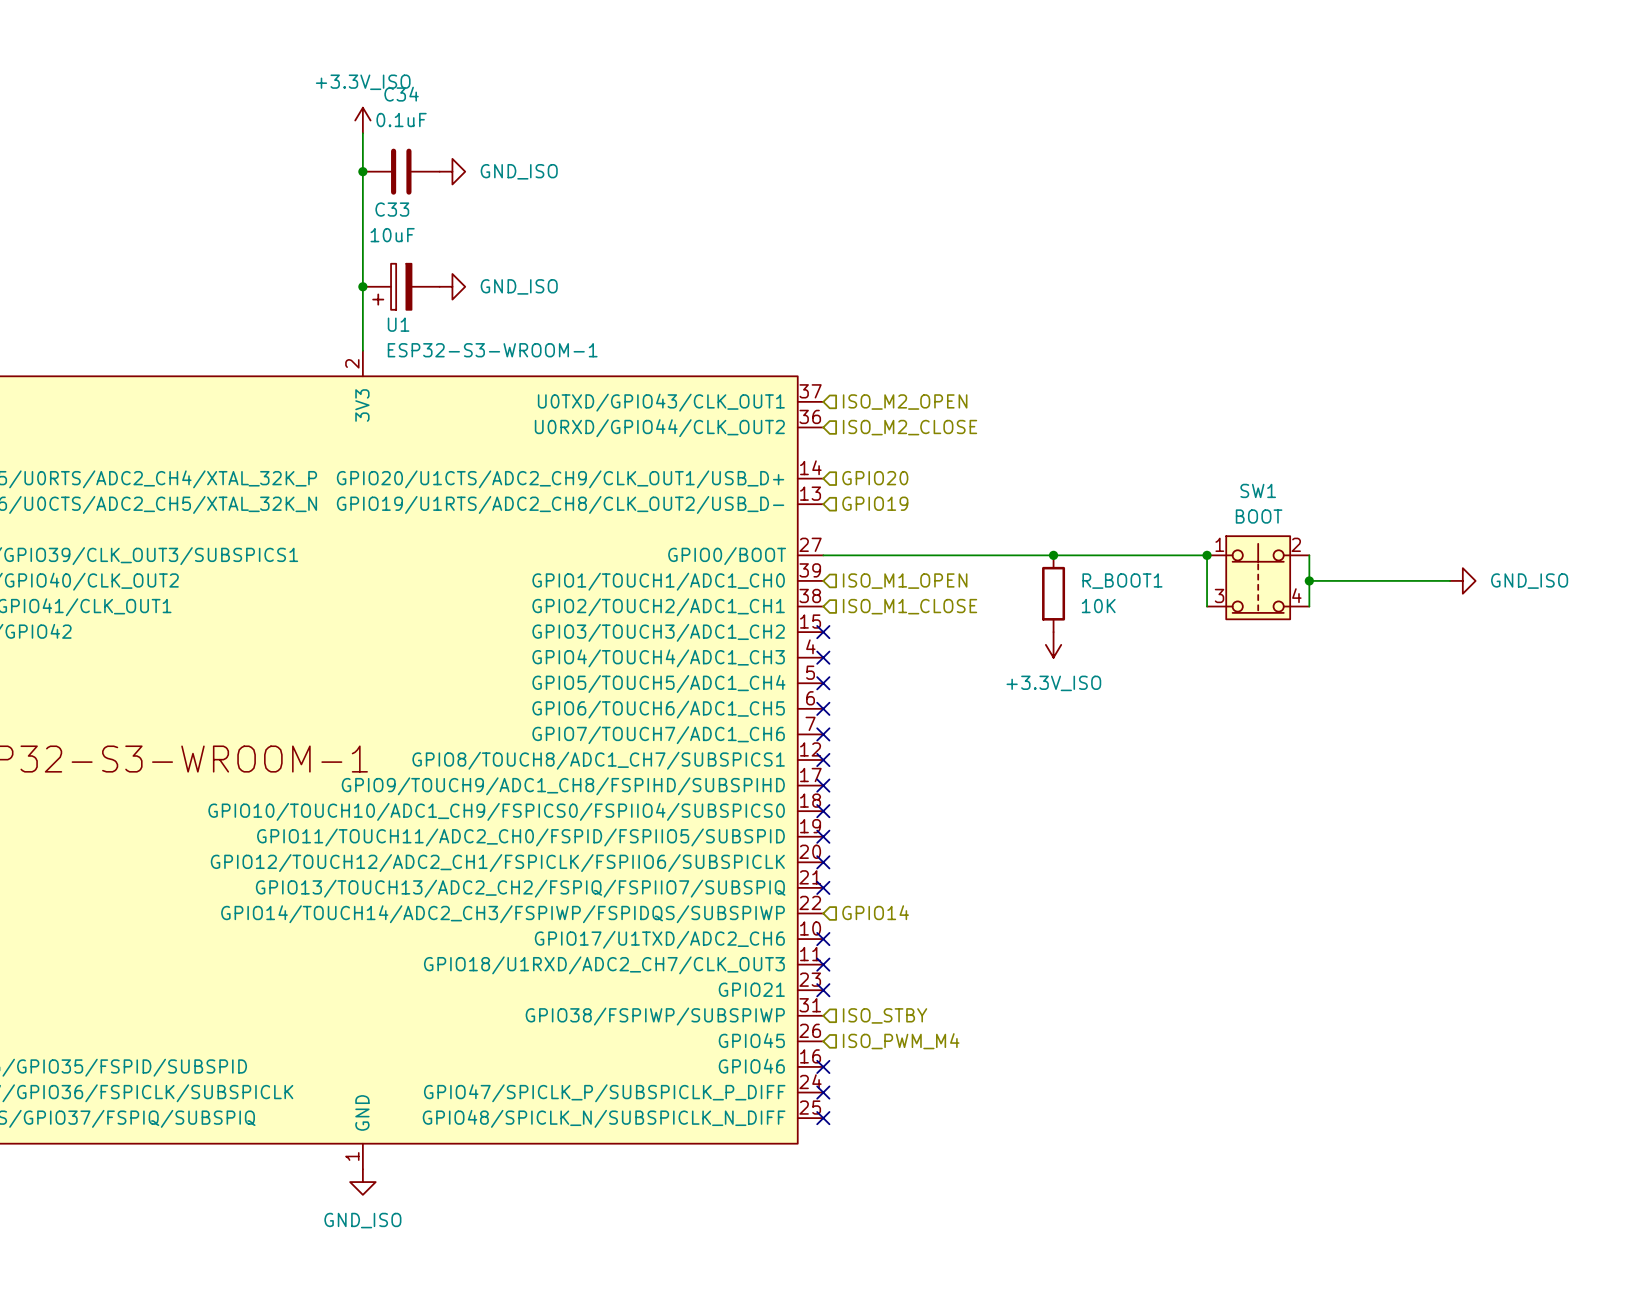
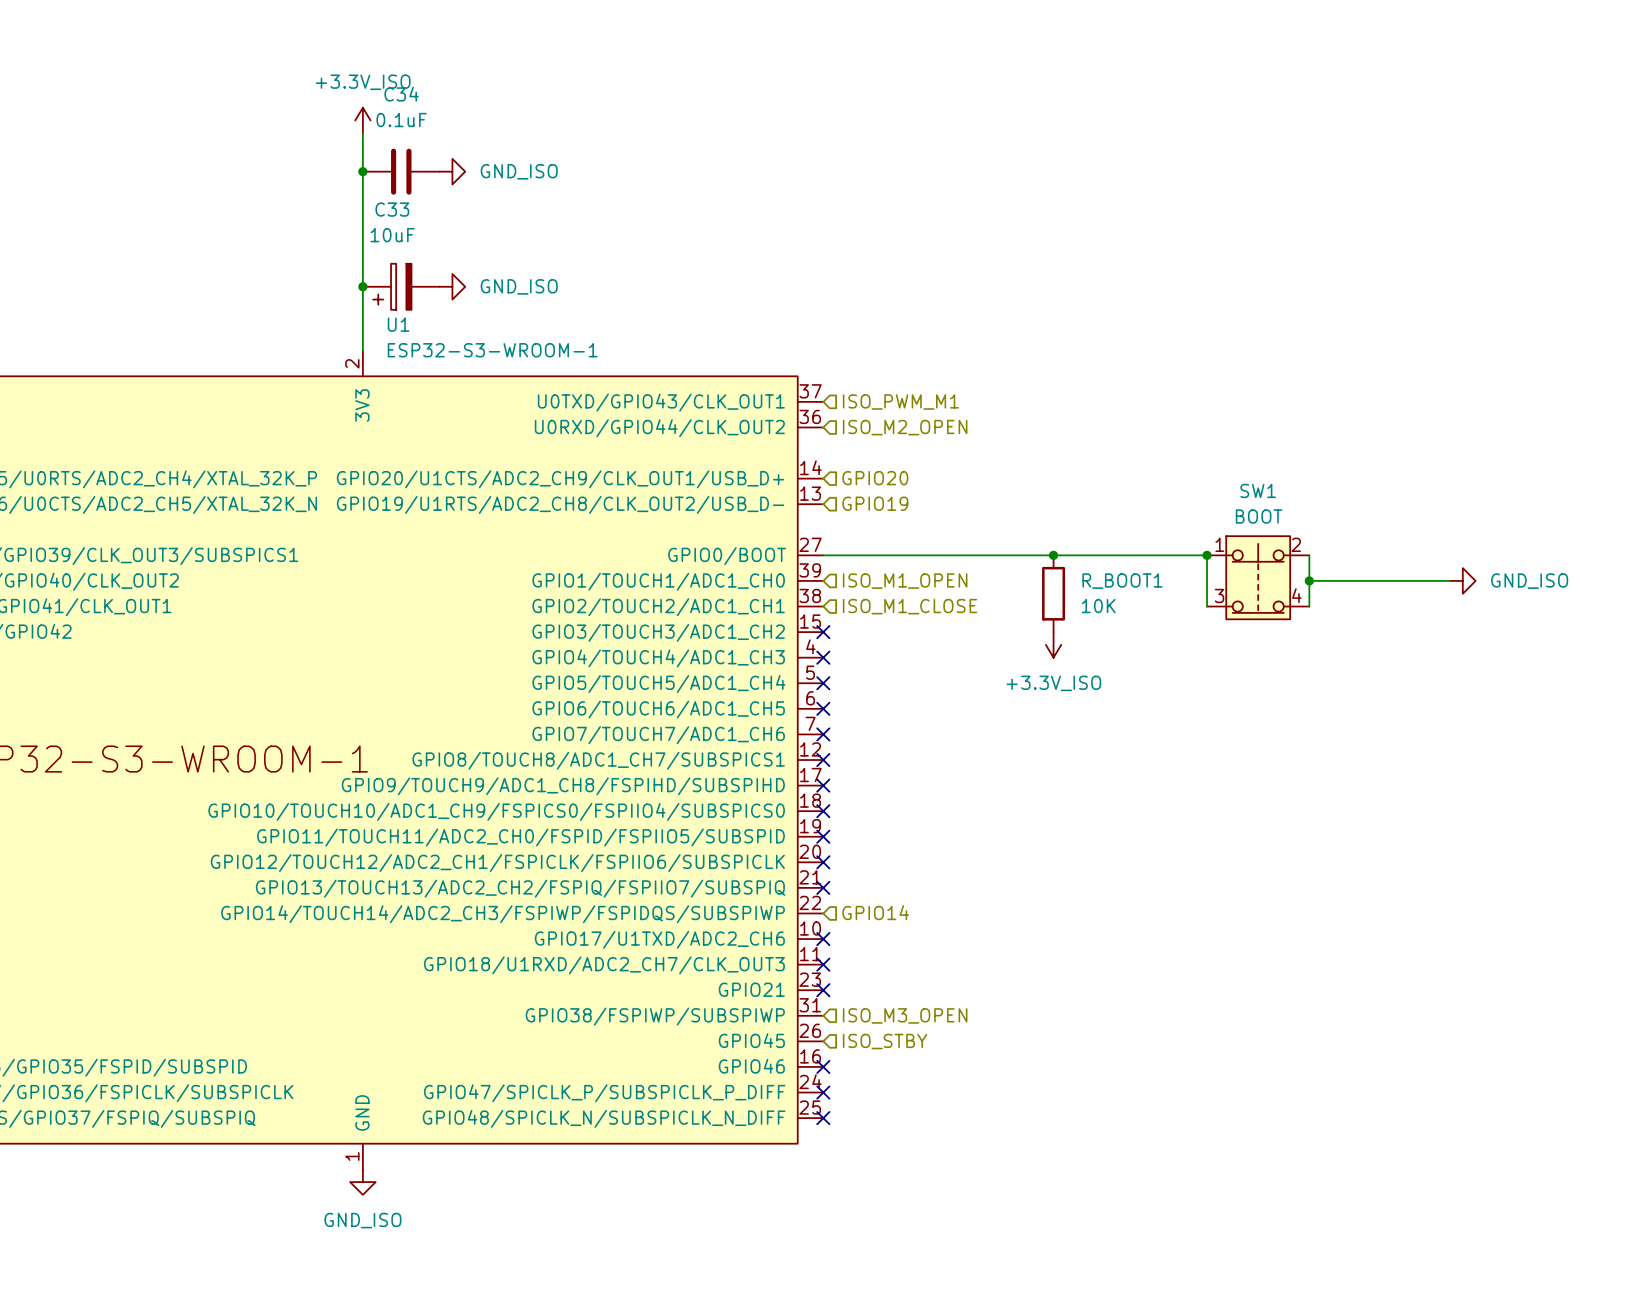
hierarchical label: ISO_M2_OPEN (905, 402) -> ISO_PWM_M1 (900, 402)
hierarchical label: ISO_M2_CLOSE (910, 427) -> ISO_M2_OPEN (905, 427)
hierarchical label: ISO_STBY (885, 1015) -> ISO_M3_OPEN (905, 1015)
hierarchical label: ISO_PWM_M4 (901, 1041) -> ISO_STBY (885, 1041)

